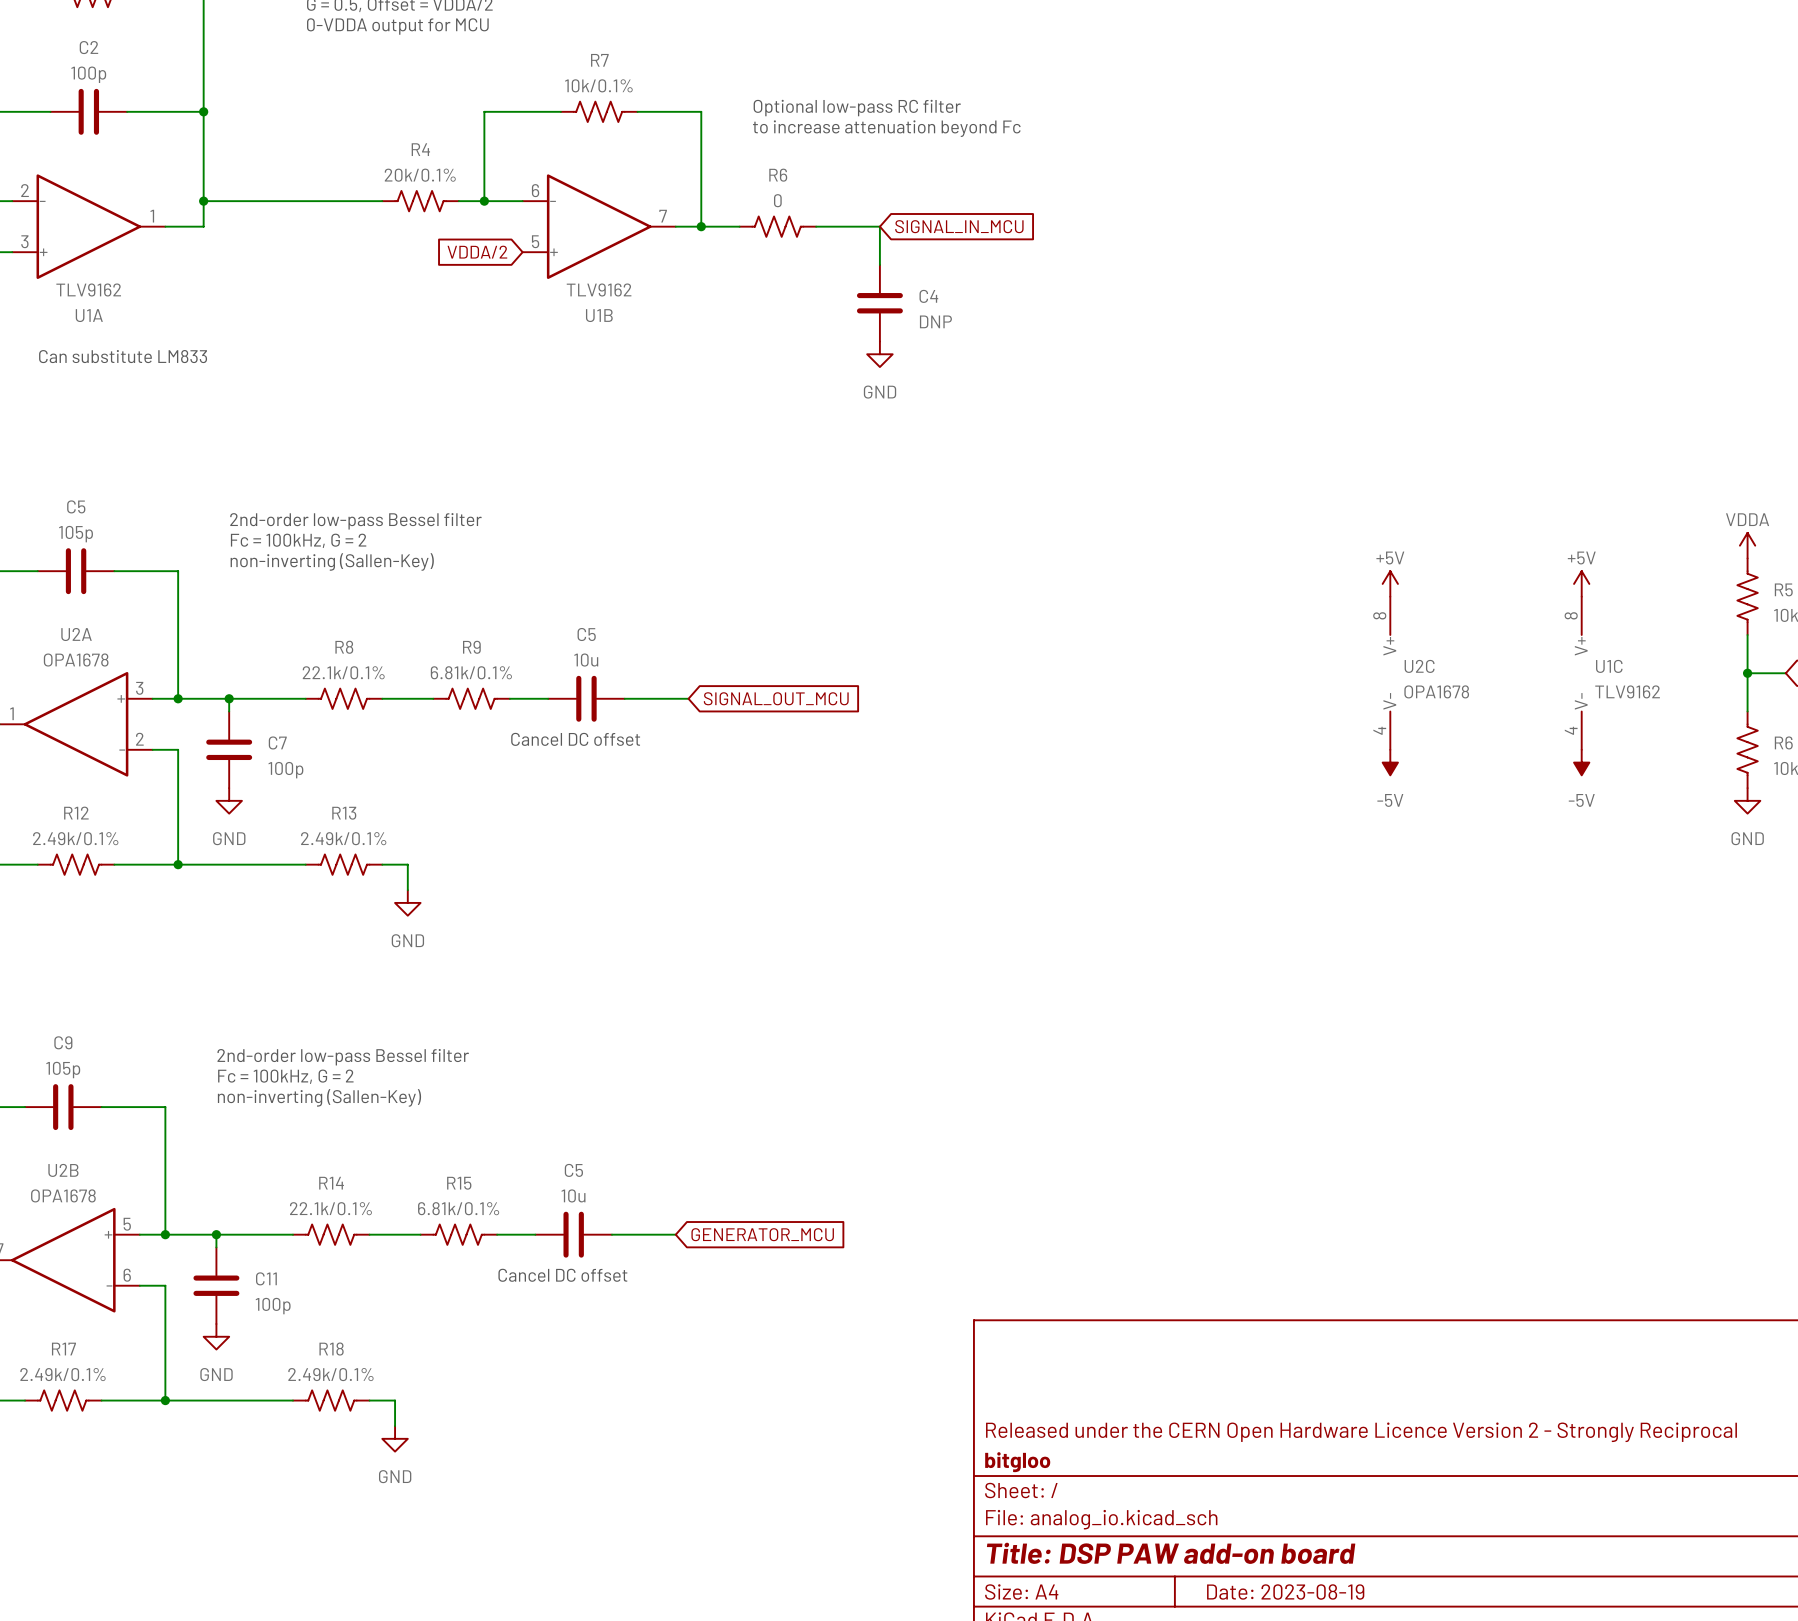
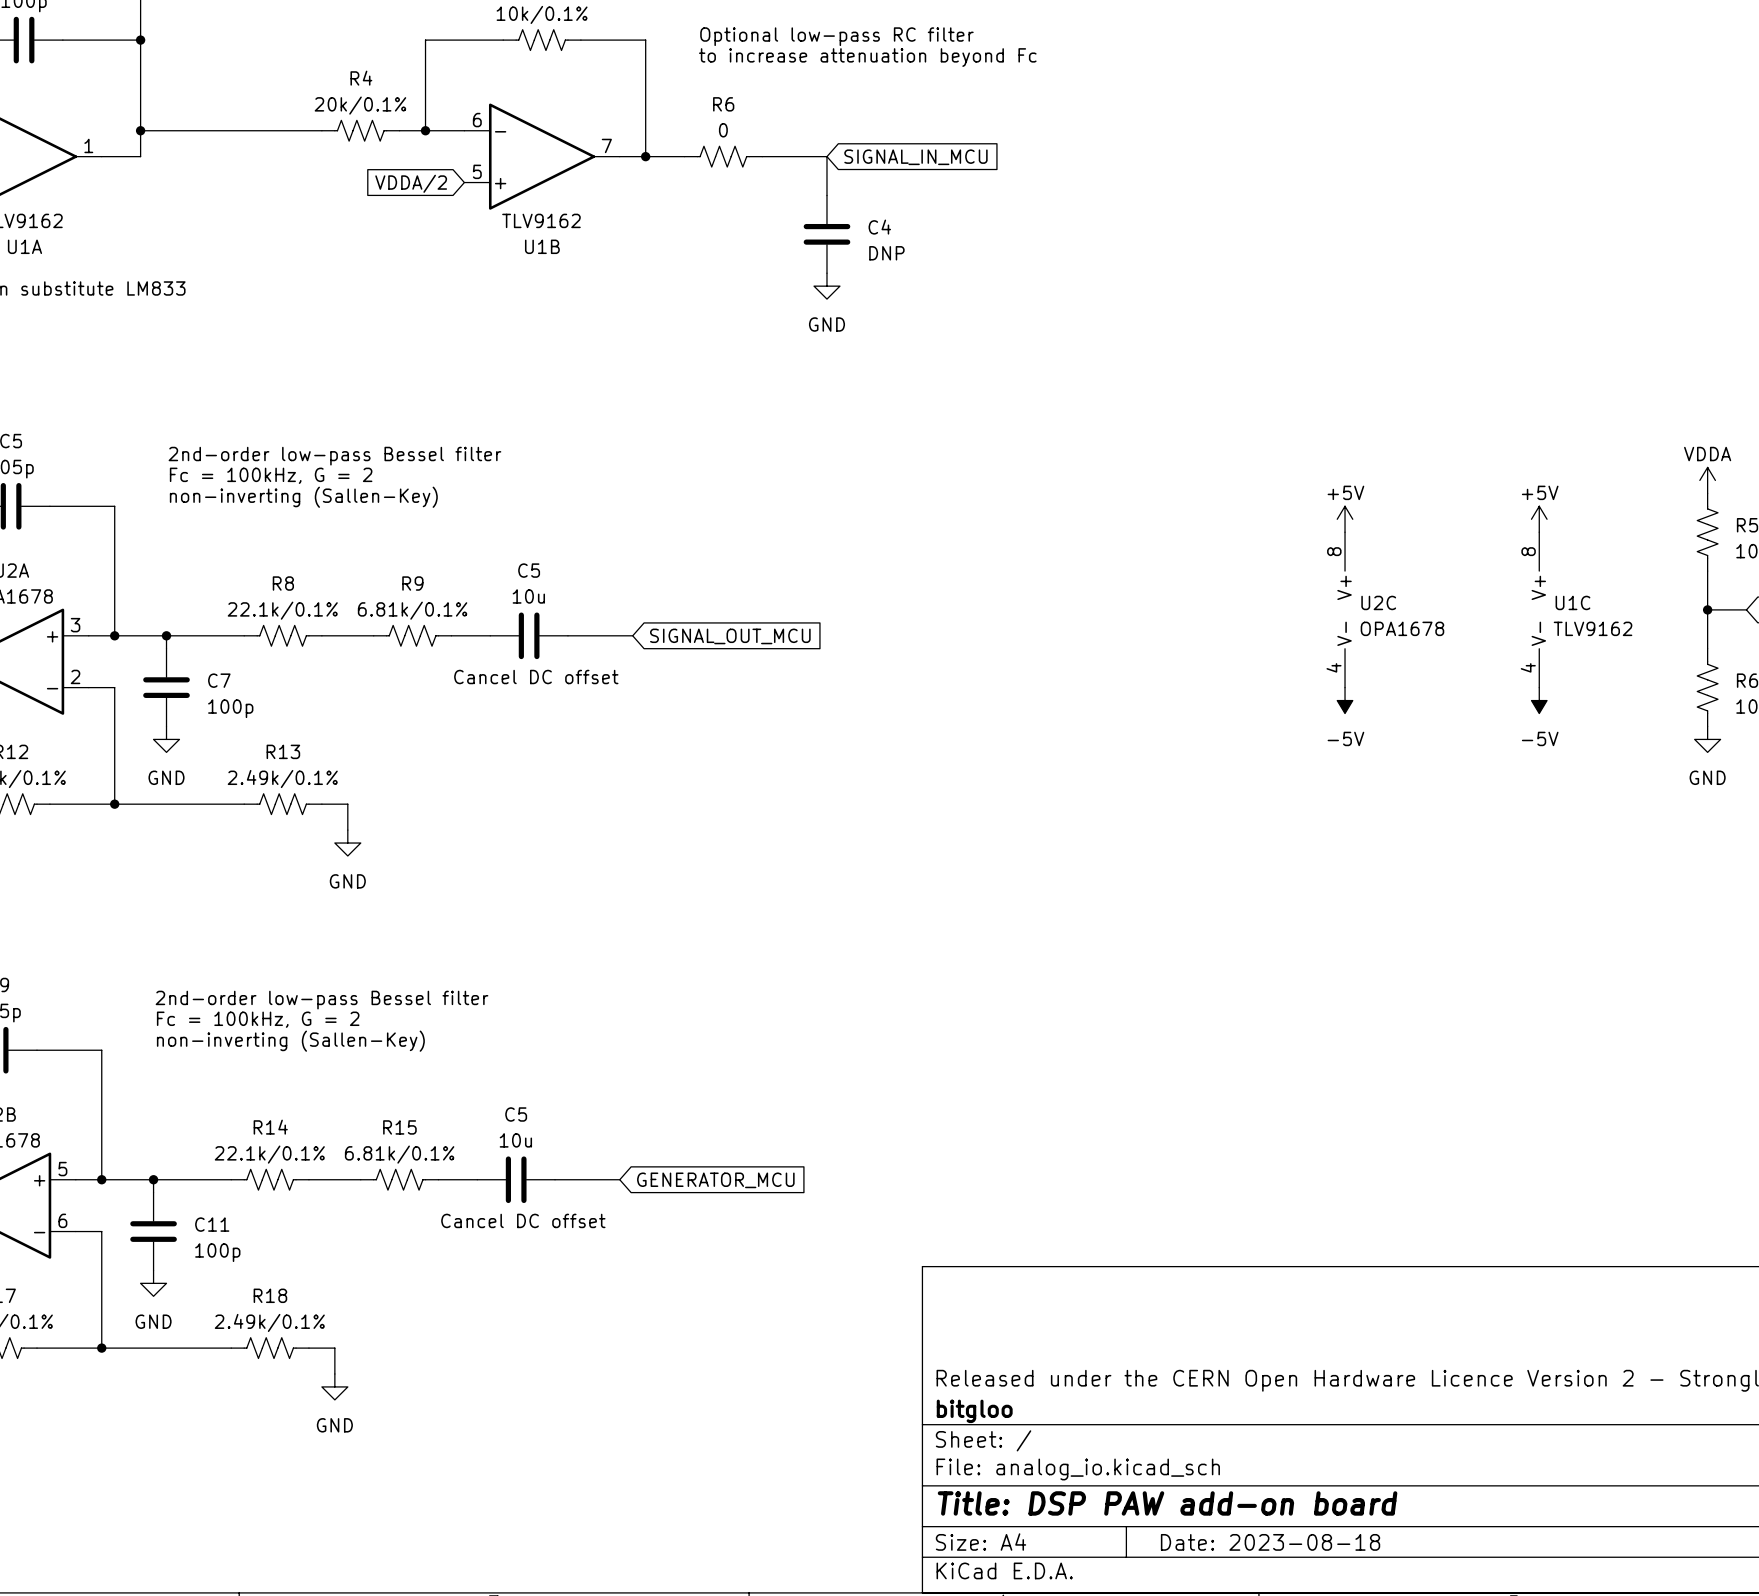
title block: Date: 2023-08-19 (1285, 1591) -> Date: 2023-08-18 (1270, 1542)

